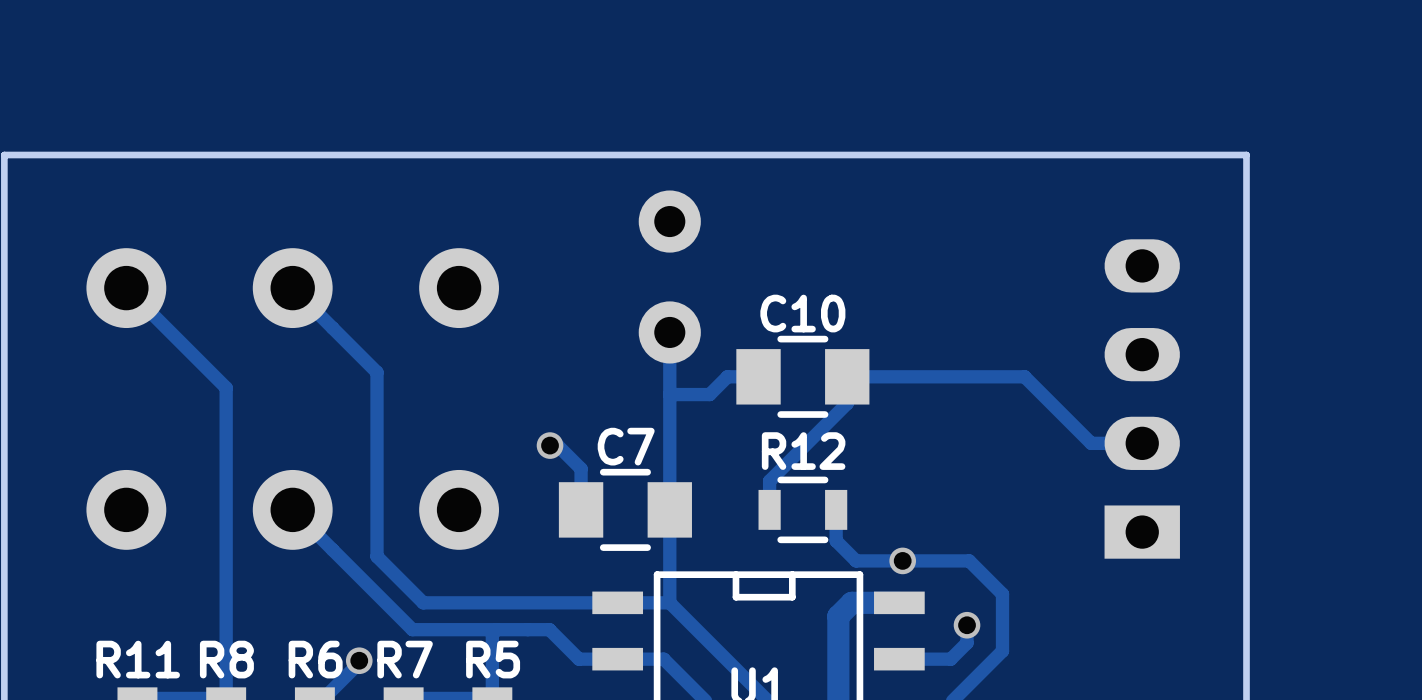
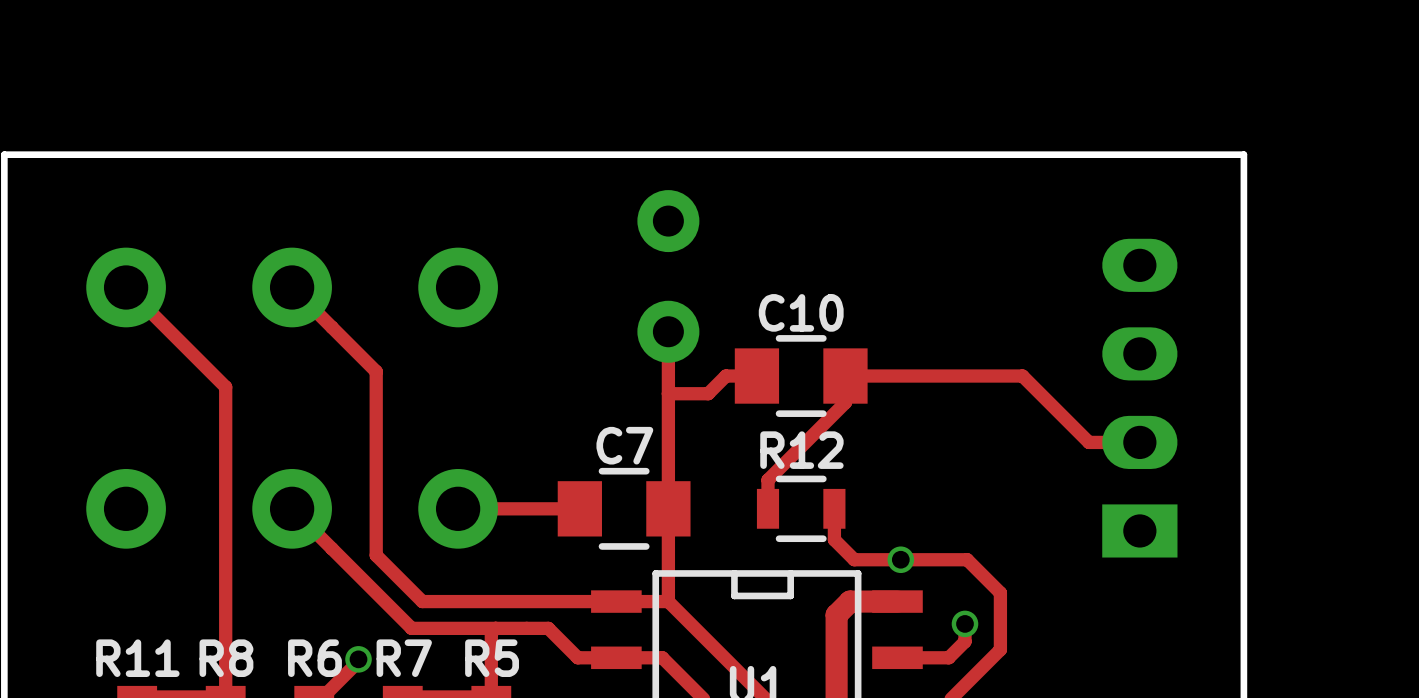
track: (550, 445) (557, 445) (581, 468) (581, 509) -> (458, 508) (579, 508)
via: (550, 445) -> none

